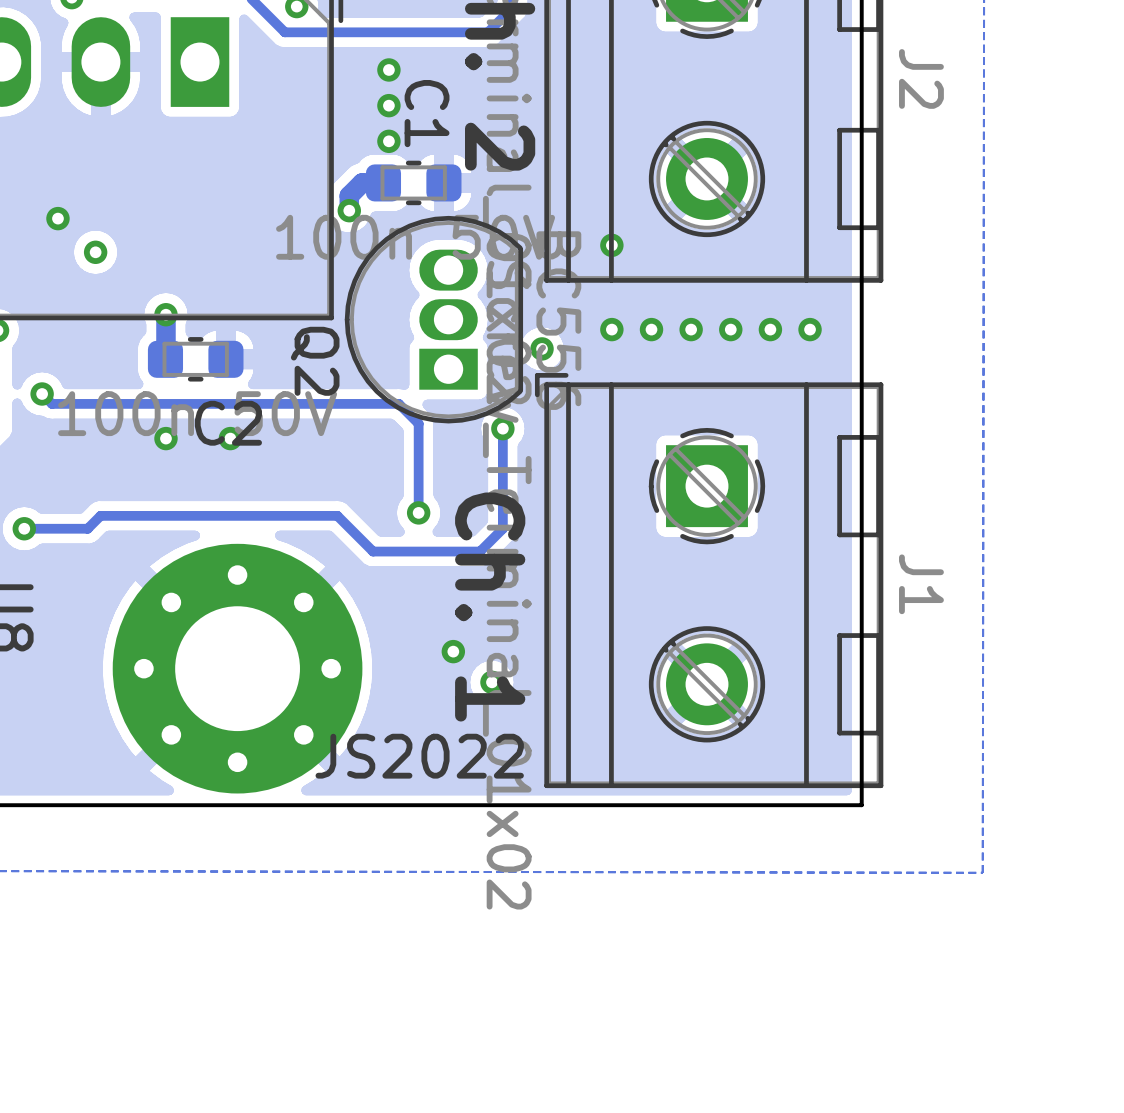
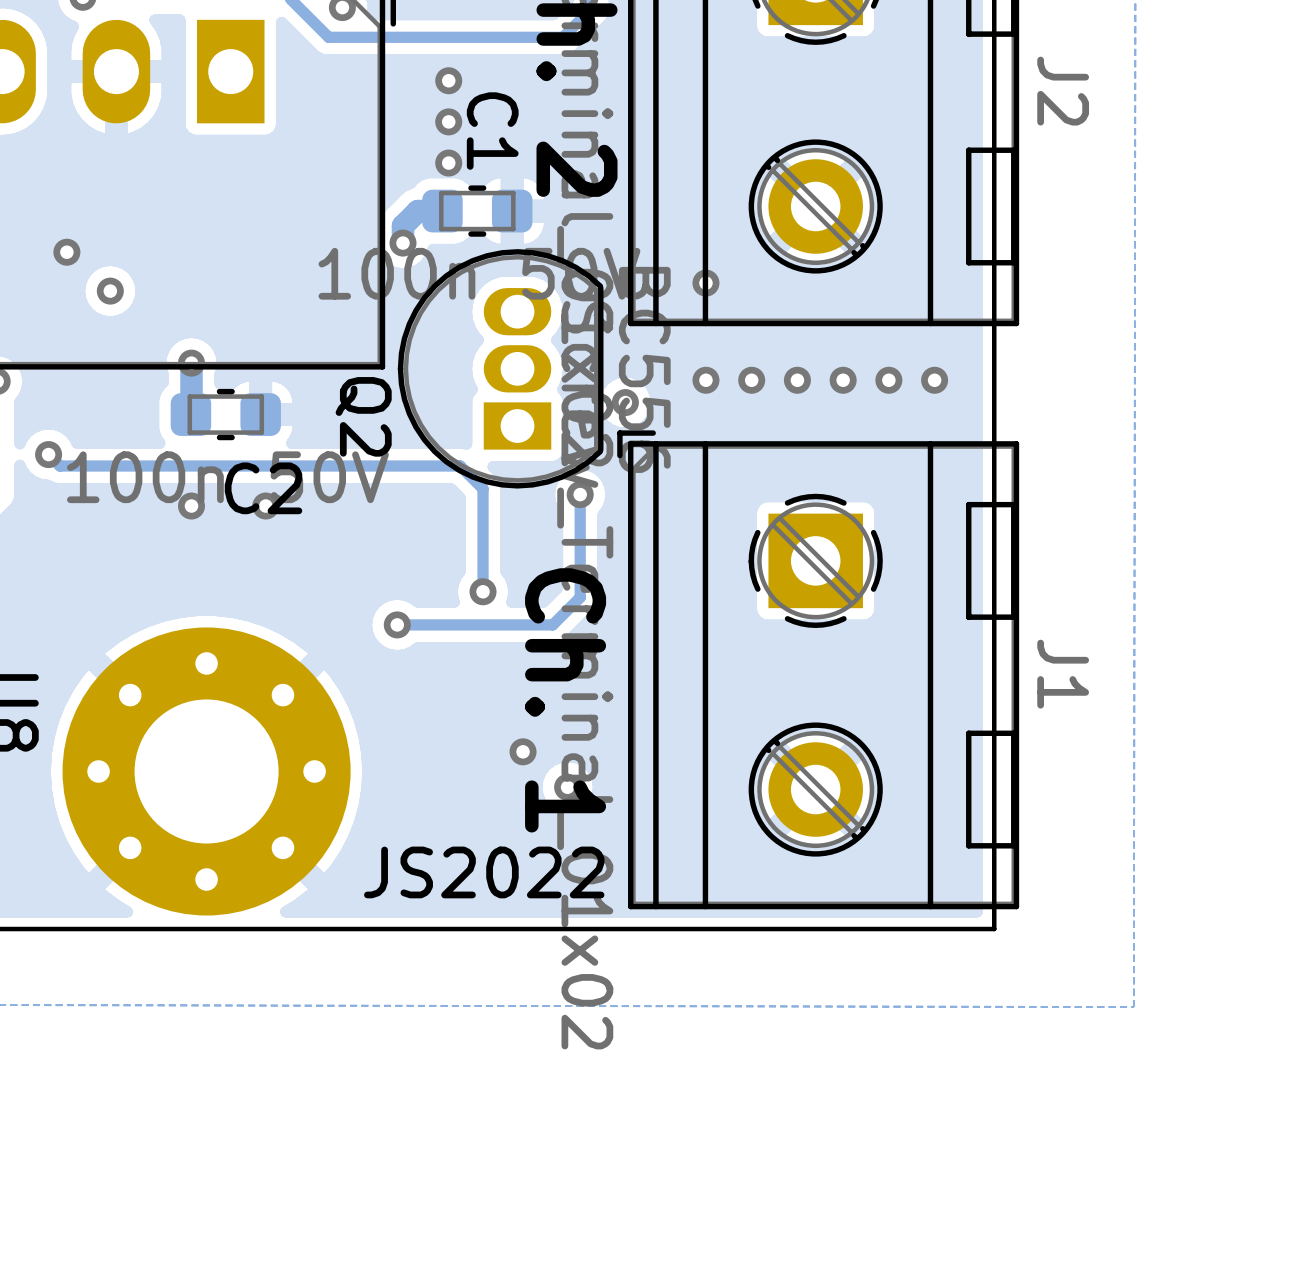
track: (502, 517) (502, 528) (480, 551) (373, 551) (337, 515) (100, 515) (87, 528) (24, 528) -> (580, 597) (552, 624) (397, 624)
via: (24, 528) -> none
via: none -> (397, 624)
part position: (237, 668) -> (206, 771)

